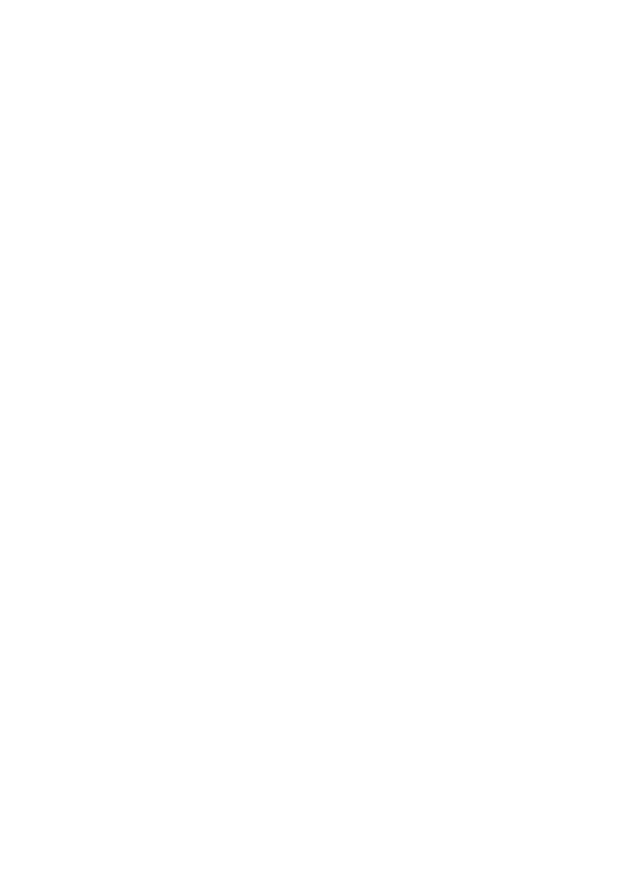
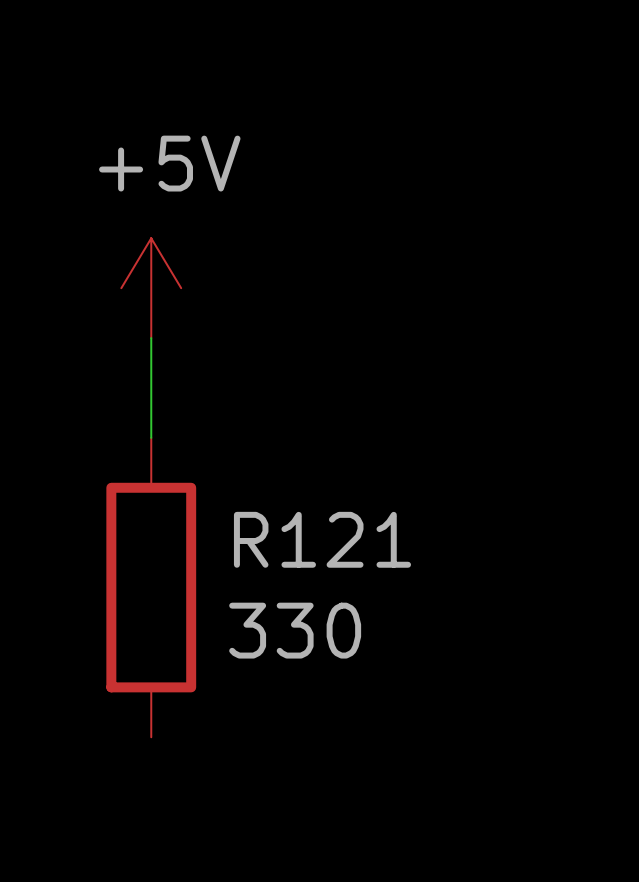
power symbol: none -> +5V (151, 288)
wire: none -> (151, 338) (151, 437)
R121: none -> 330 (151, 587)

